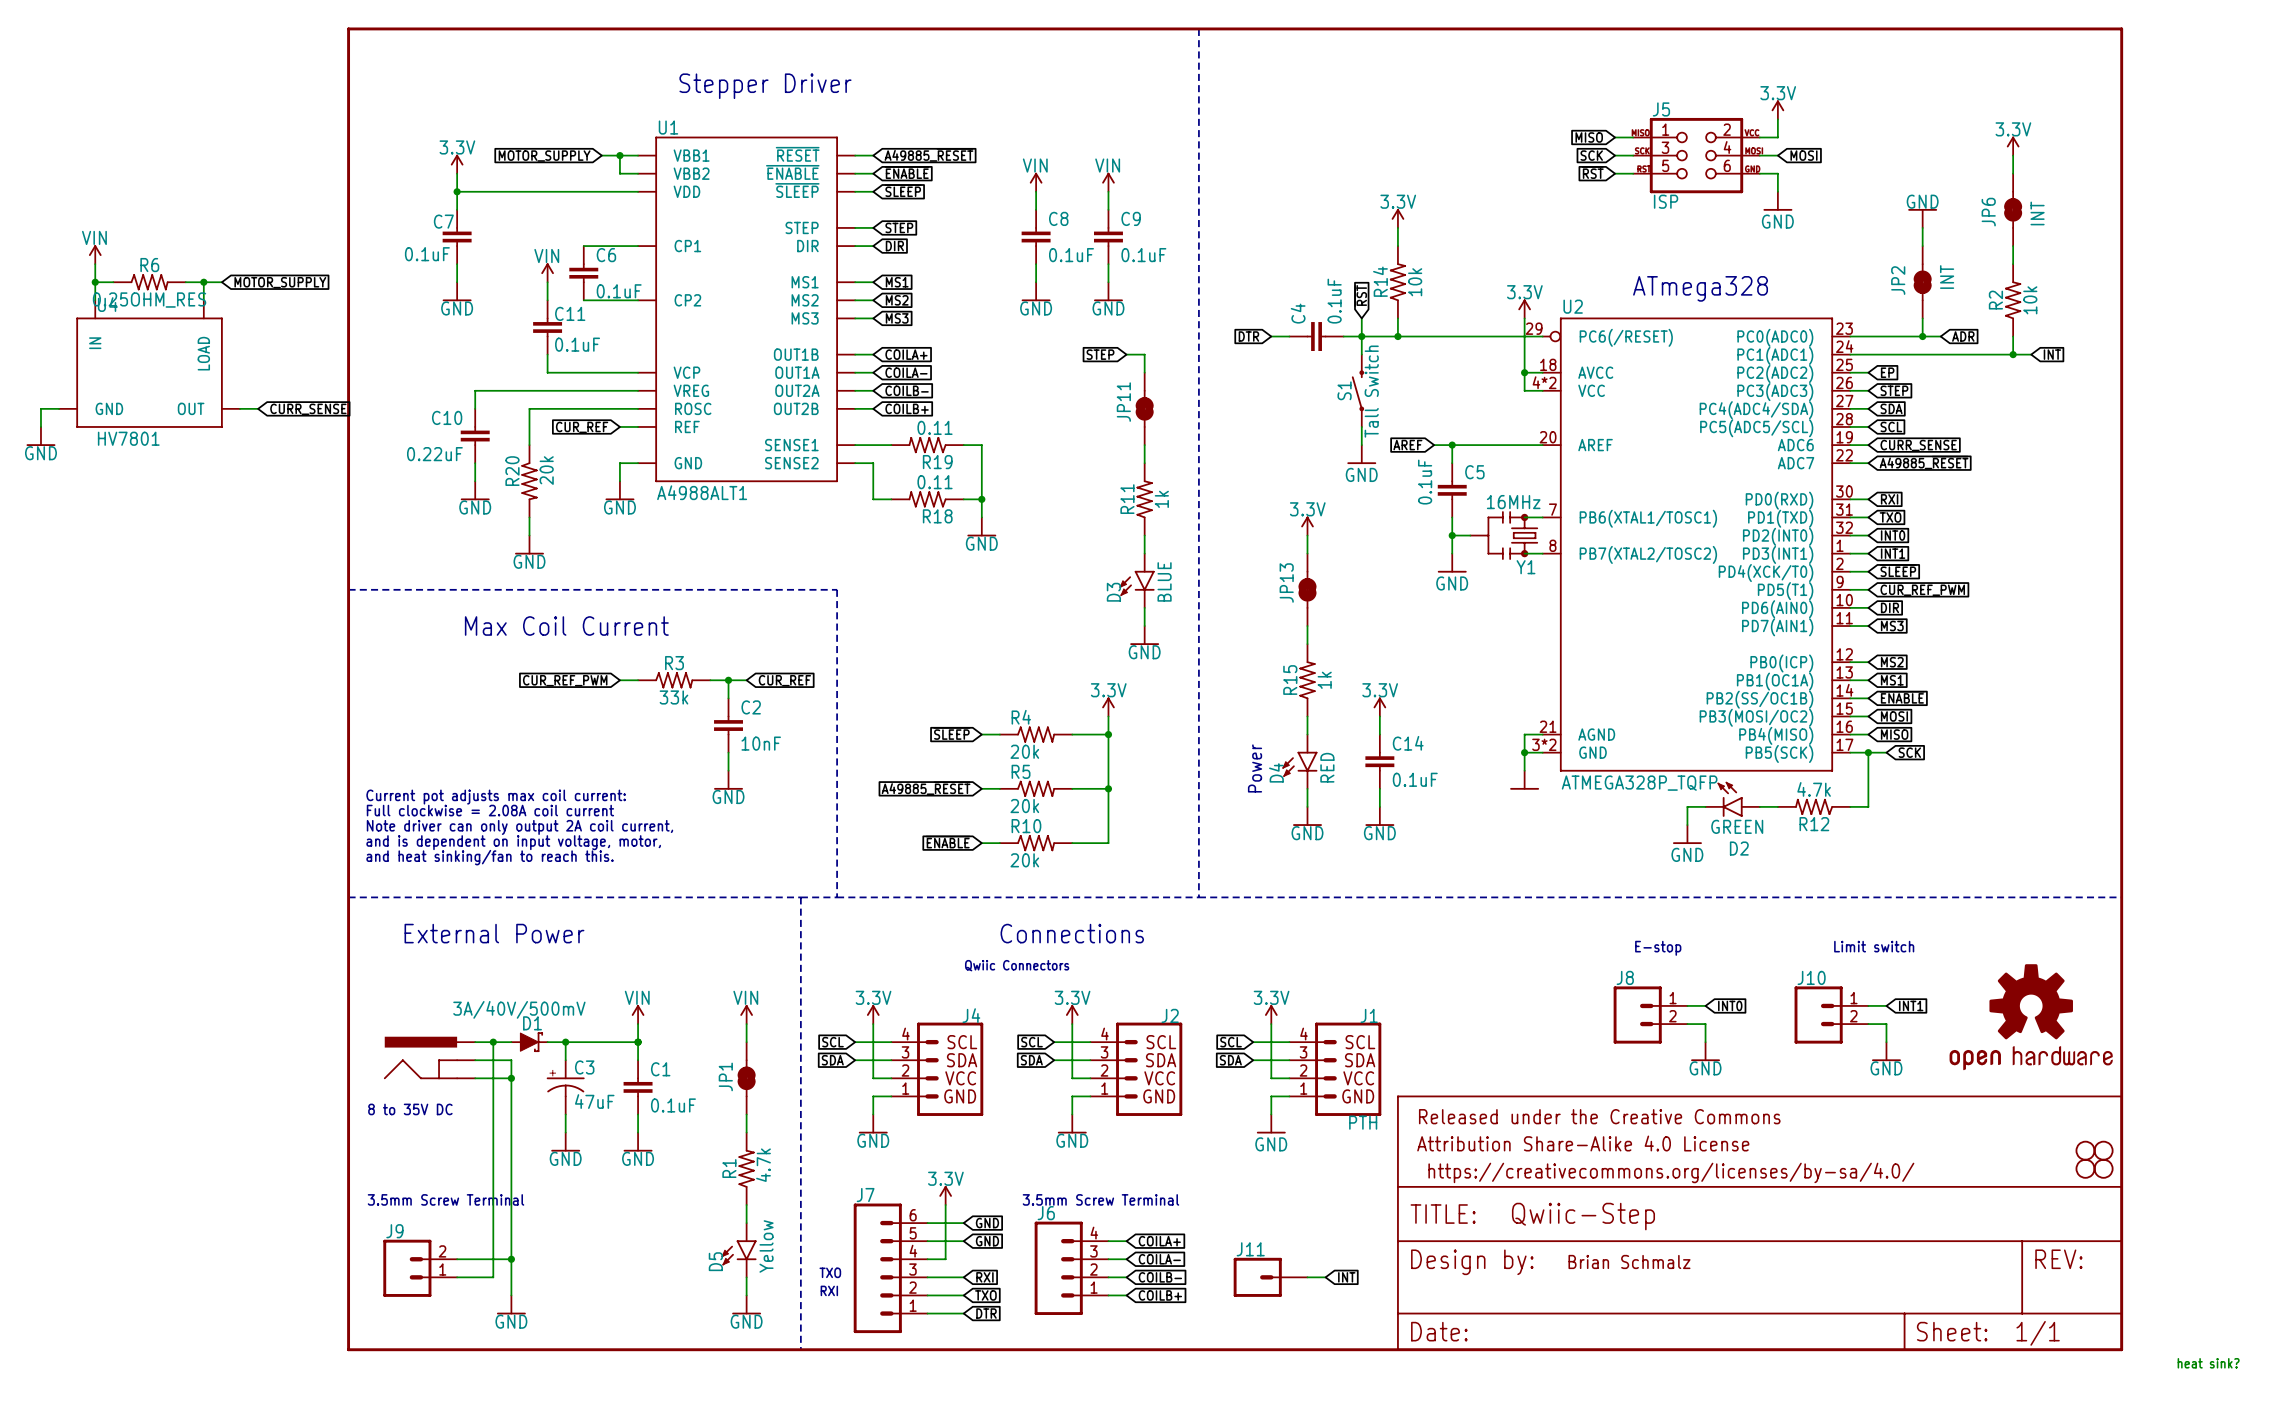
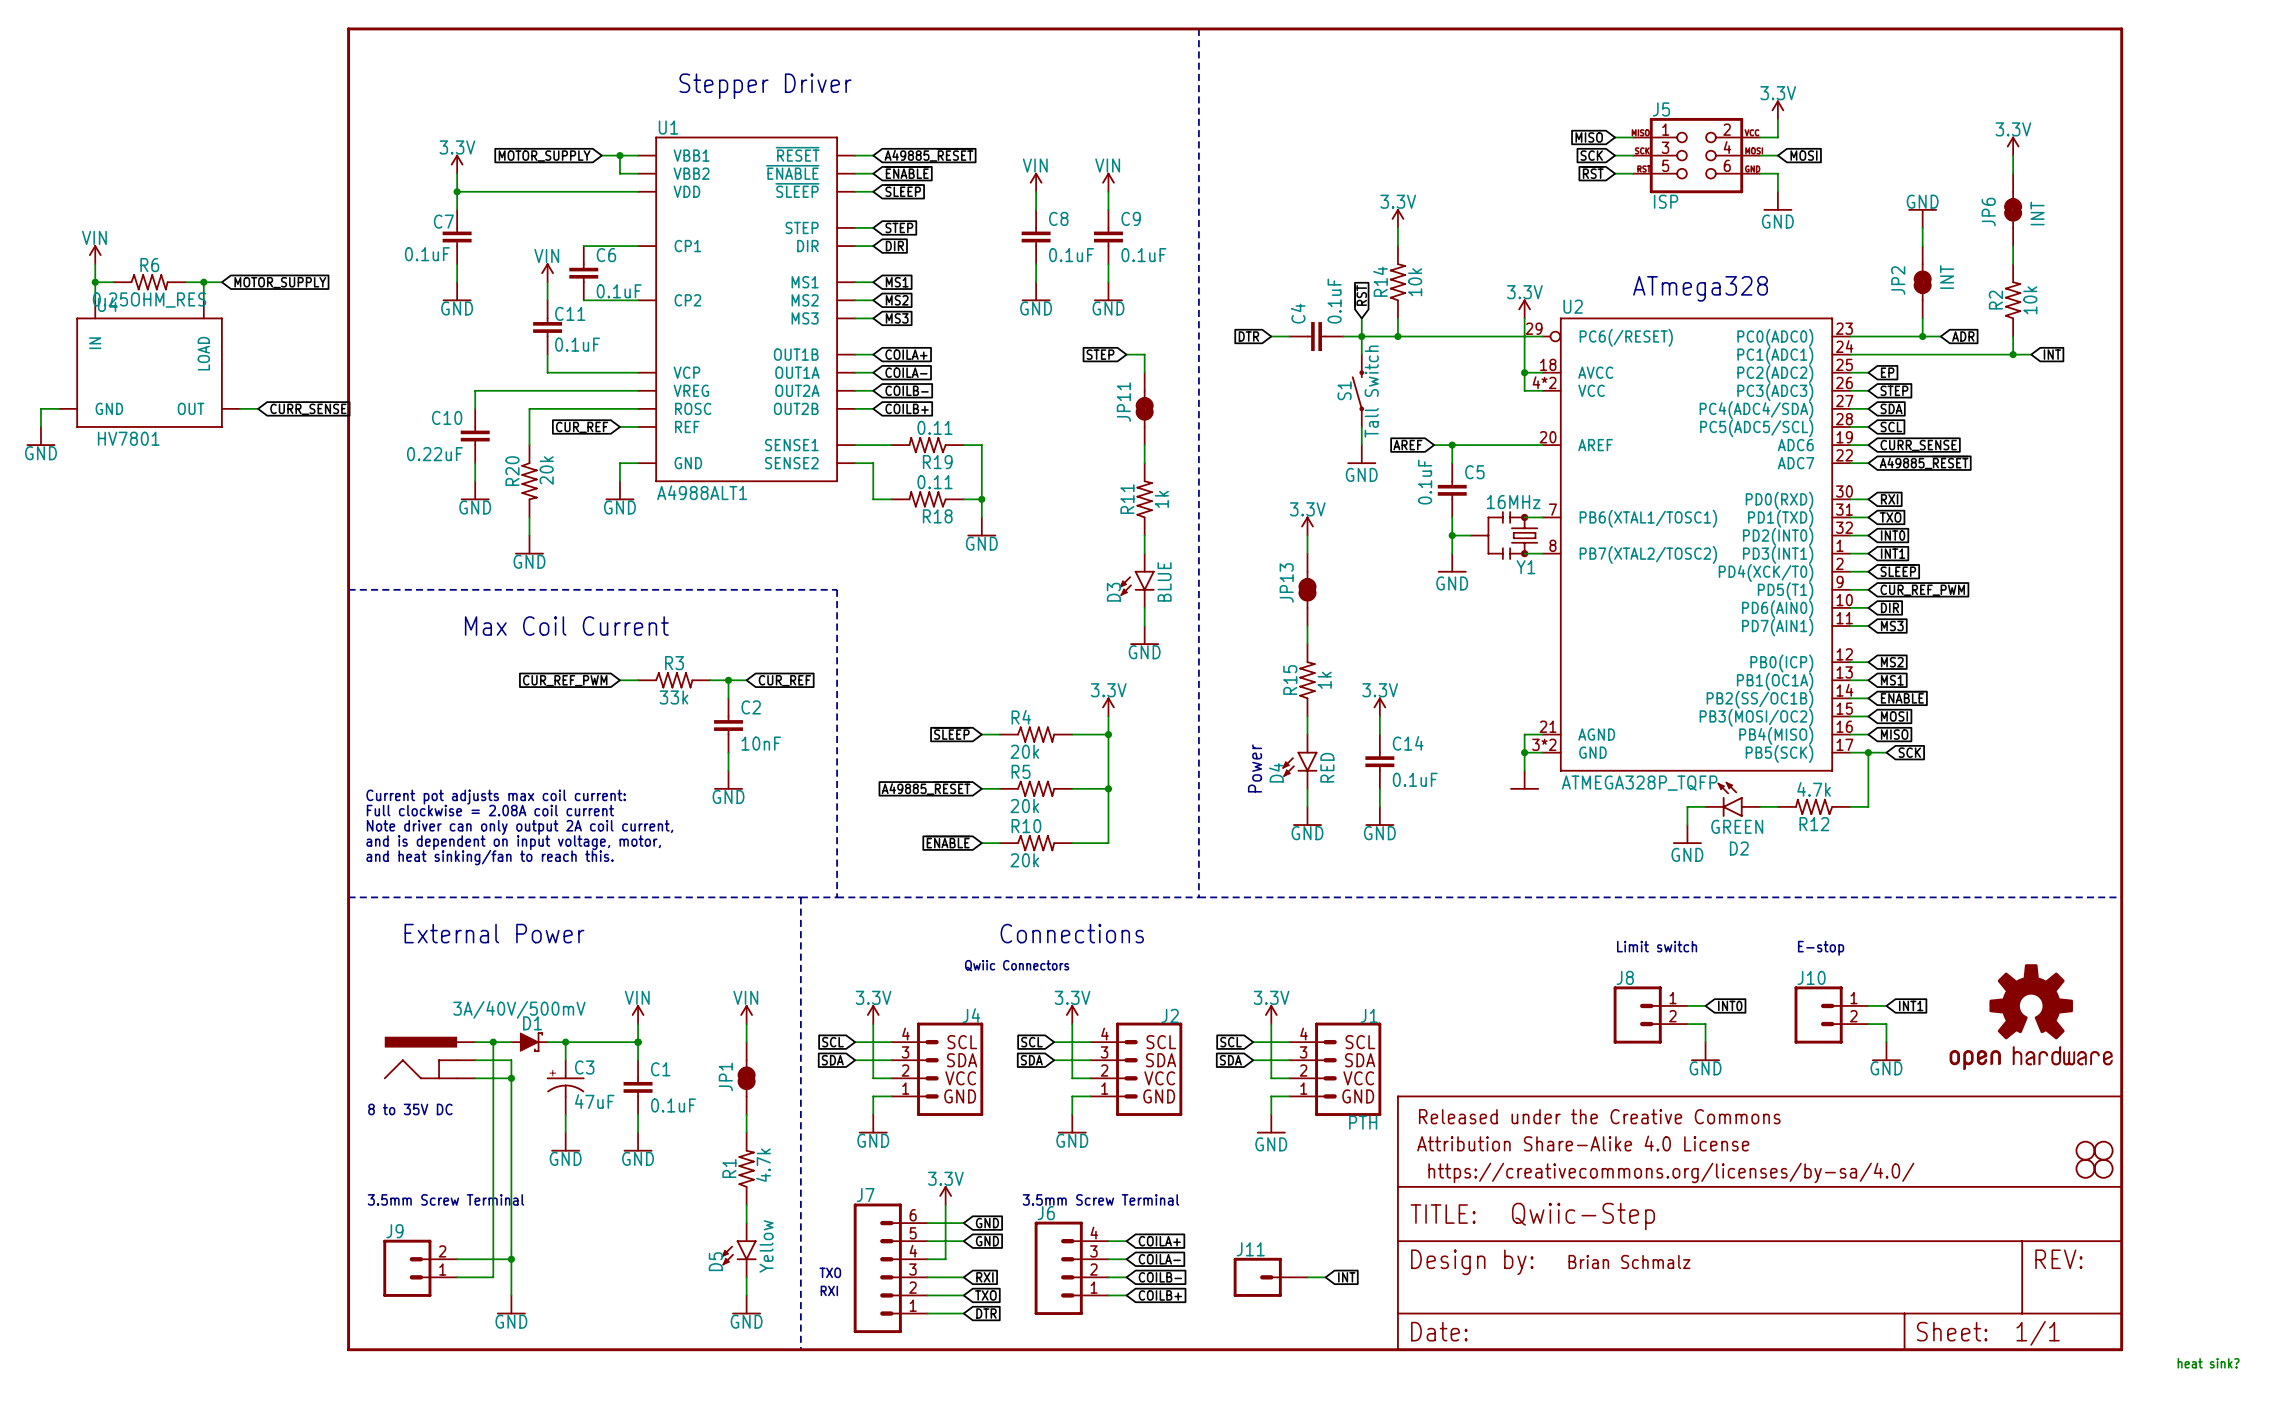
text: none -> Limit switch (1657, 946)
text: Limit switch (1874, 946) -> none
text position: E-stop (1658, 948) -> E-stop (1821, 948)

